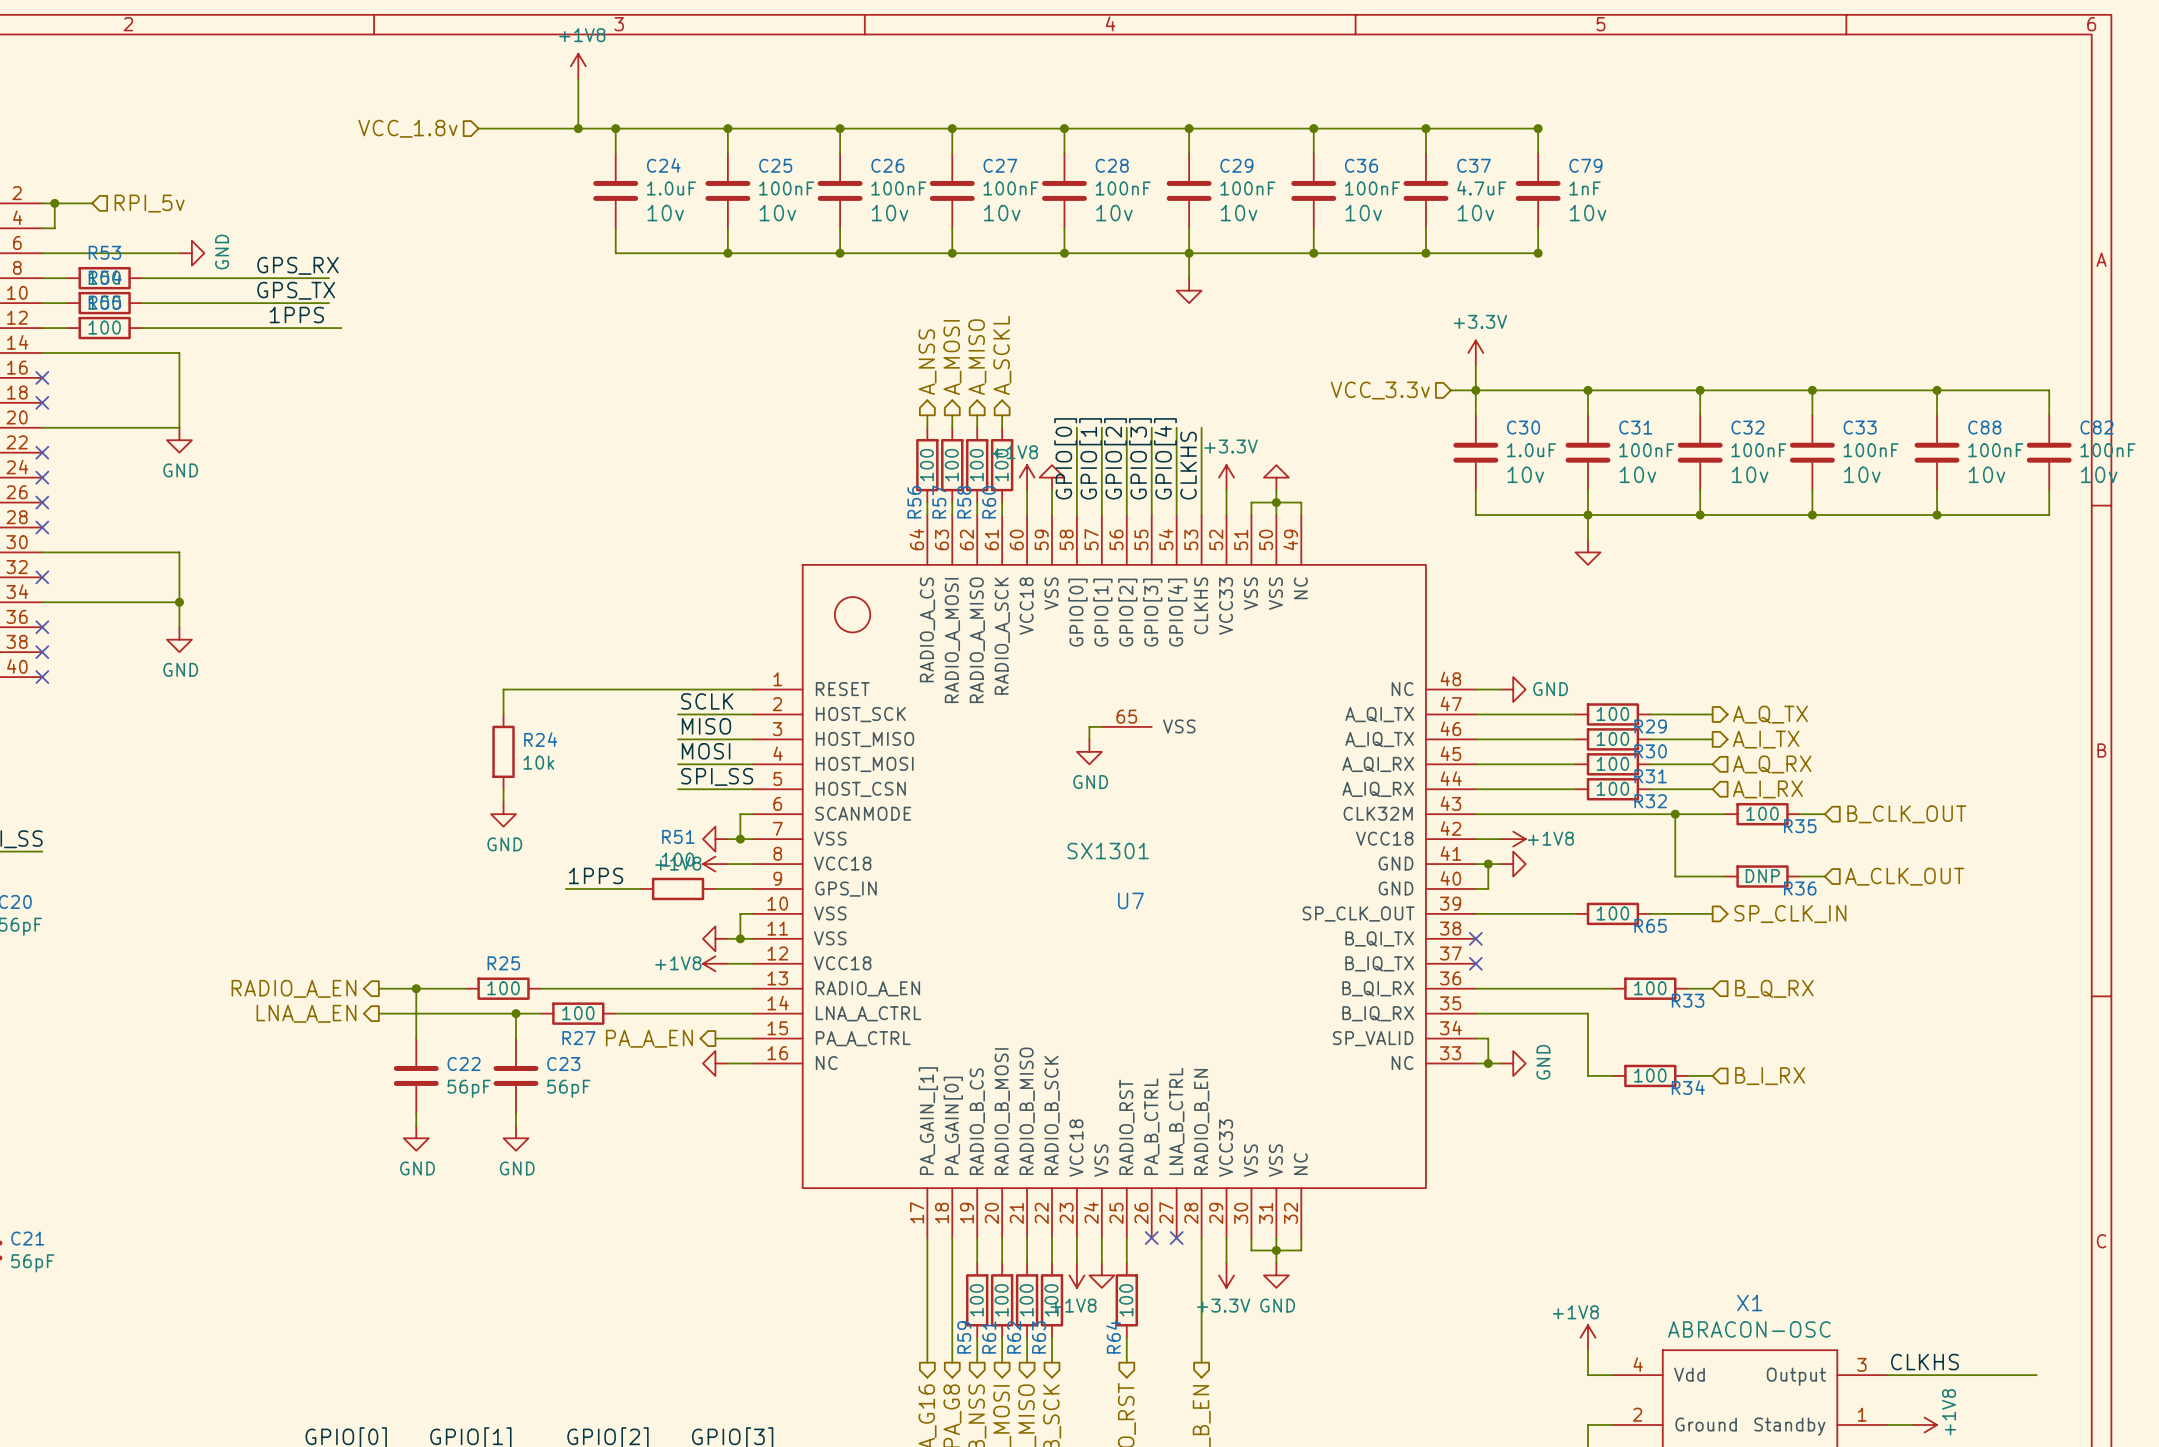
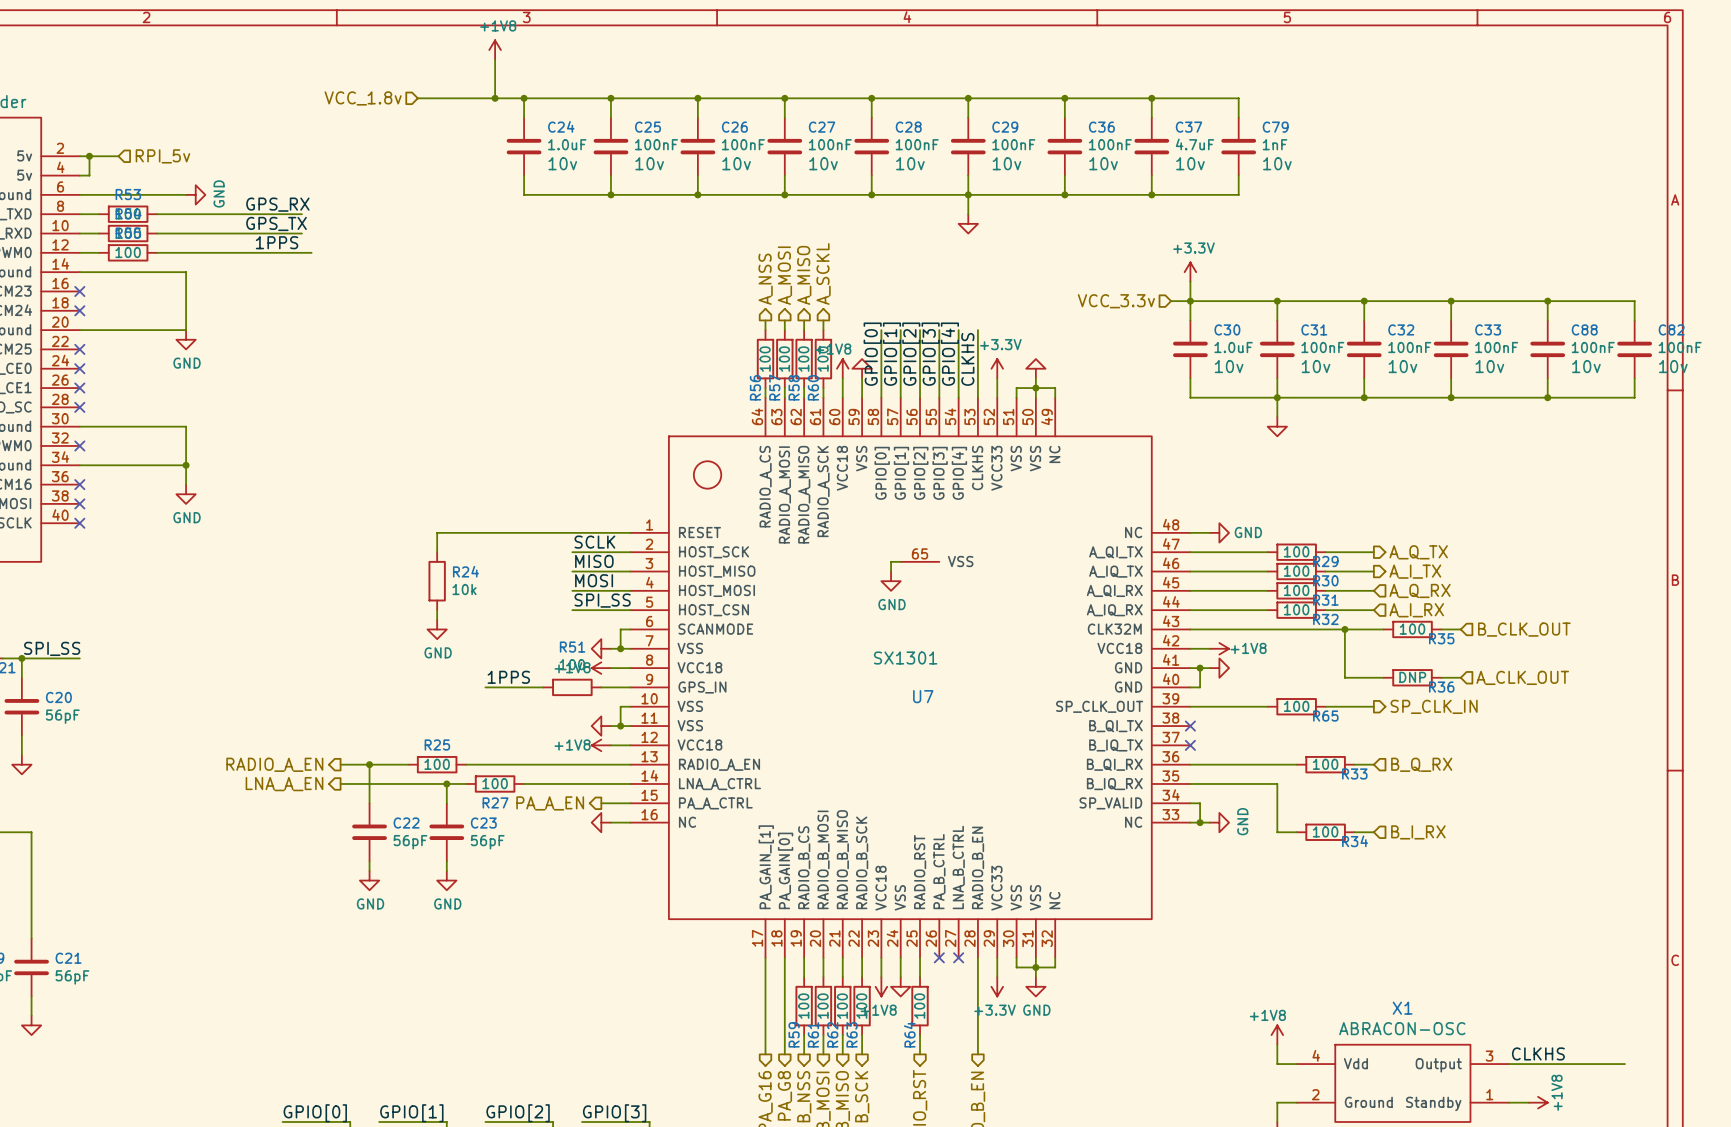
junction: (1538, 128) -> none
junction: (1538, 253) -> none

